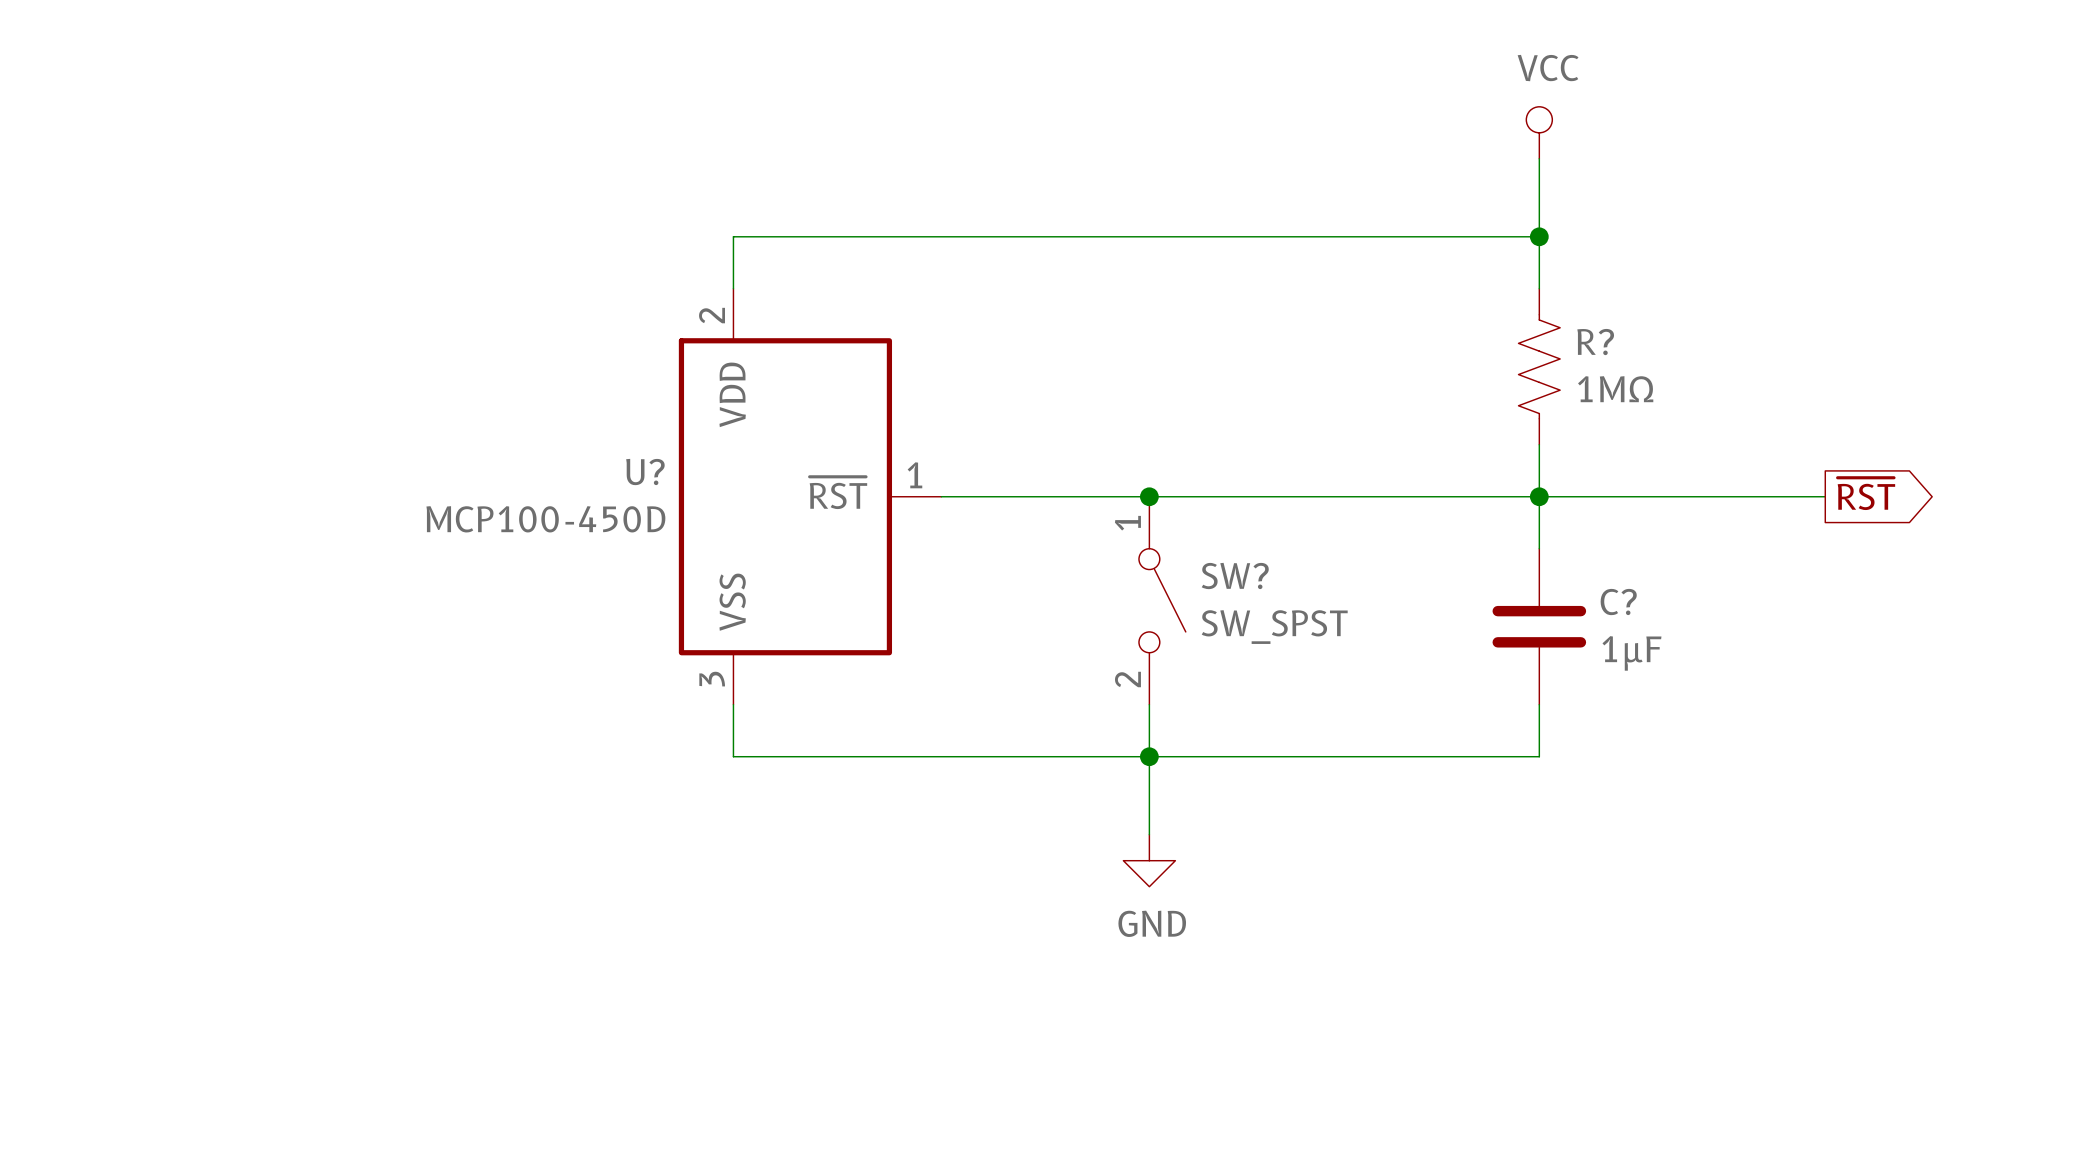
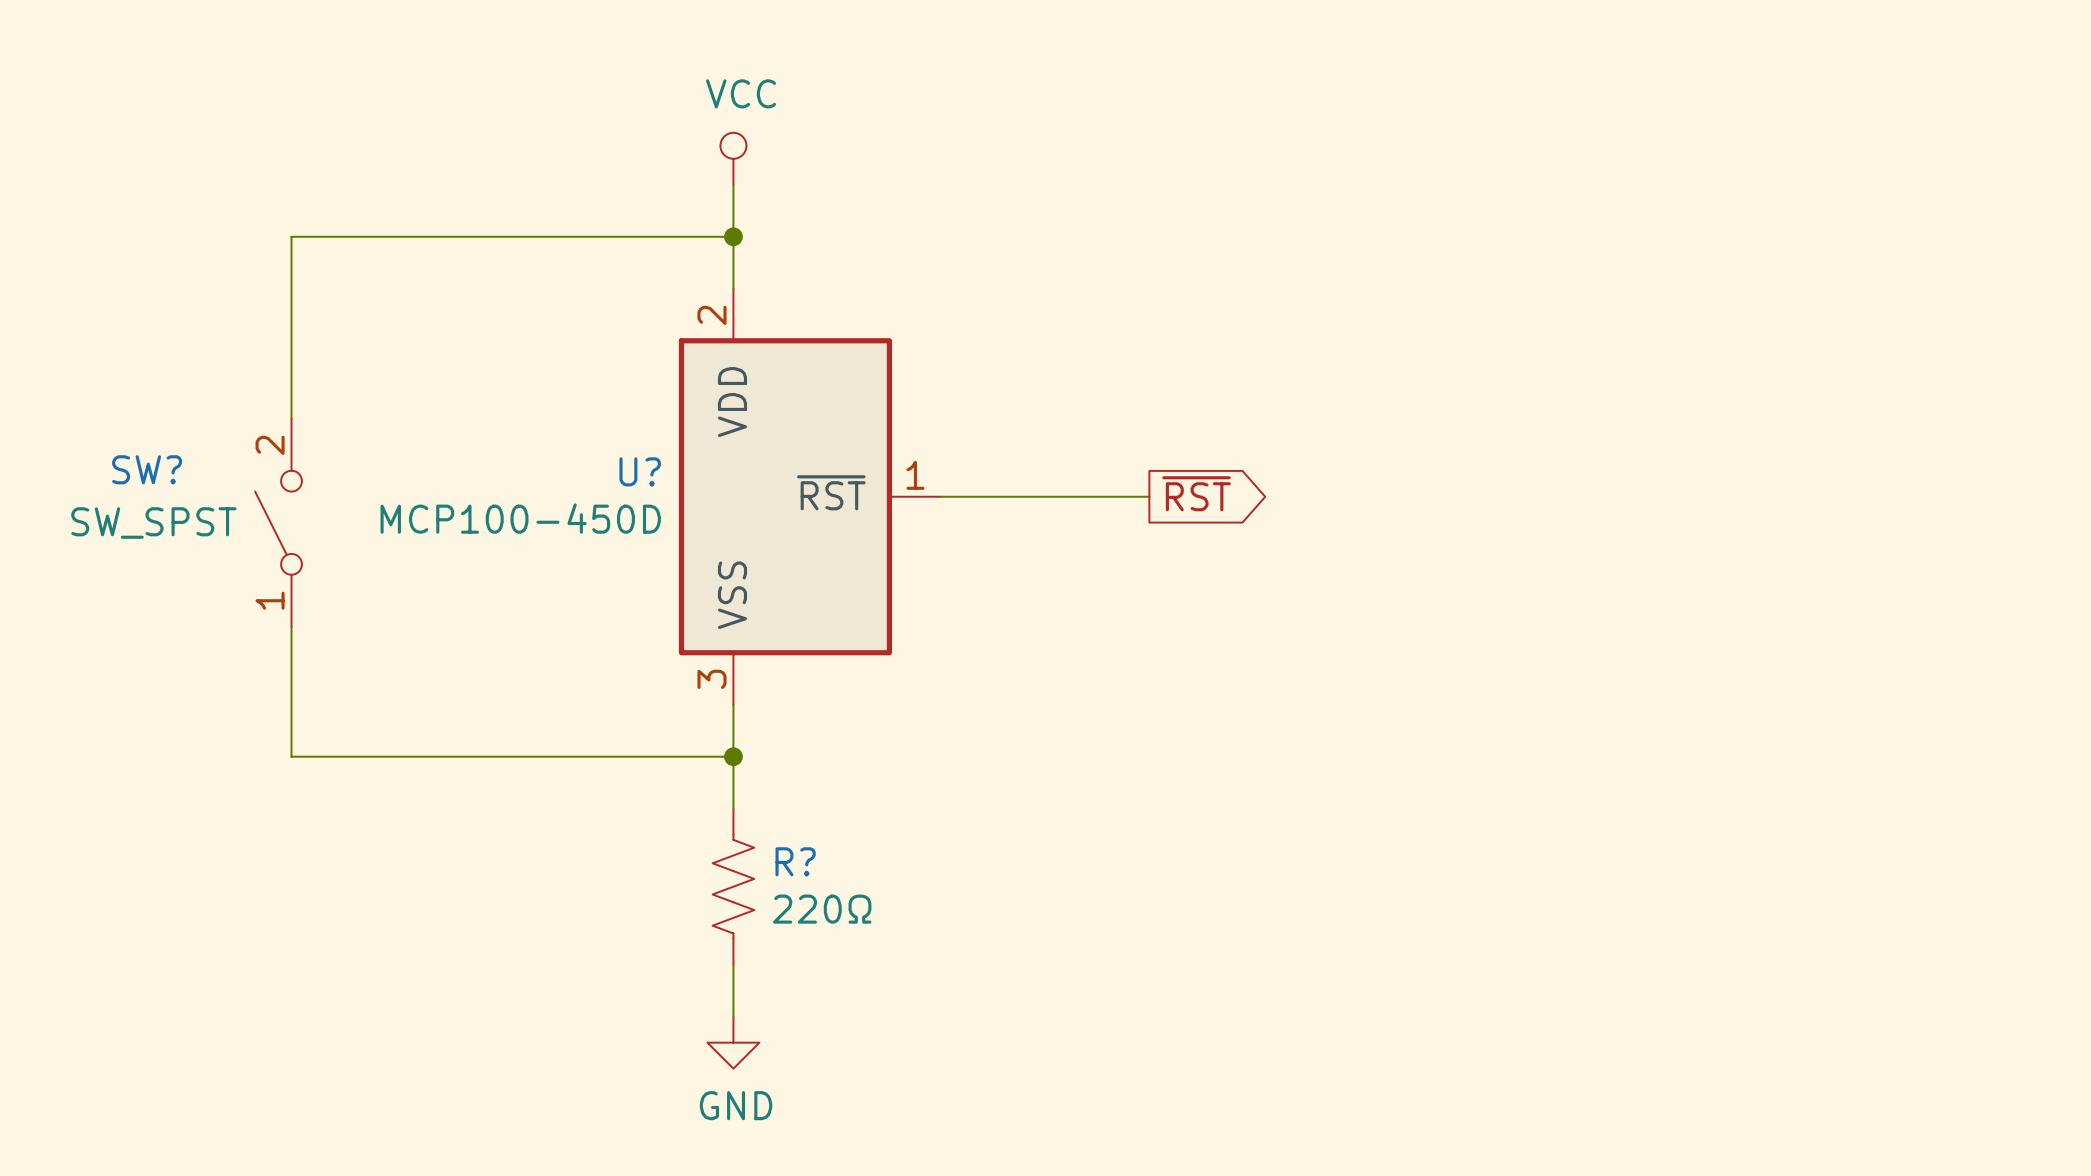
power symbol: VCC (1539, 132) -> none
power symbol: none -> VCC (733, 158)
wire: (1539, 158) (1539, 288) -> none
wire: none -> (733, 184) (733, 236) (291, 236) (291, 418)
wire: (733, 236) (1539, 236) -> none
junction: none -> (733, 236)
junction: (1539, 236) -> none
R?: 1MΩ (1539, 366) -> none
wire: (1539, 444) (1539, 548) -> none
global label: none -> ~{RST} (1196, 493)
global label: ~{RST} (1866, 493) -> none
wire: (1149, 496) (1825, 496) -> none
junction: (1149, 496) -> none
junction: (1539, 496) -> none
SW?: none -> SW_SPST (278, 522)
SW?: SW_SPST (1162, 600) -> none
wire: none -> (291, 626) (291, 756) (733, 756) (733, 808)
C?: 1µF (1539, 626) -> none
wire: (1149, 704) (1149, 834) -> none
wire: (1539, 704) (1539, 756) (733, 756) -> none
junction: none -> (733, 756)
junction: (1149, 756) -> none
power symbol position: GND (1149, 860) -> GND (733, 1042)
R?: none -> 220Ω (733, 886)
wire: none -> (733, 964) (733, 1016)

